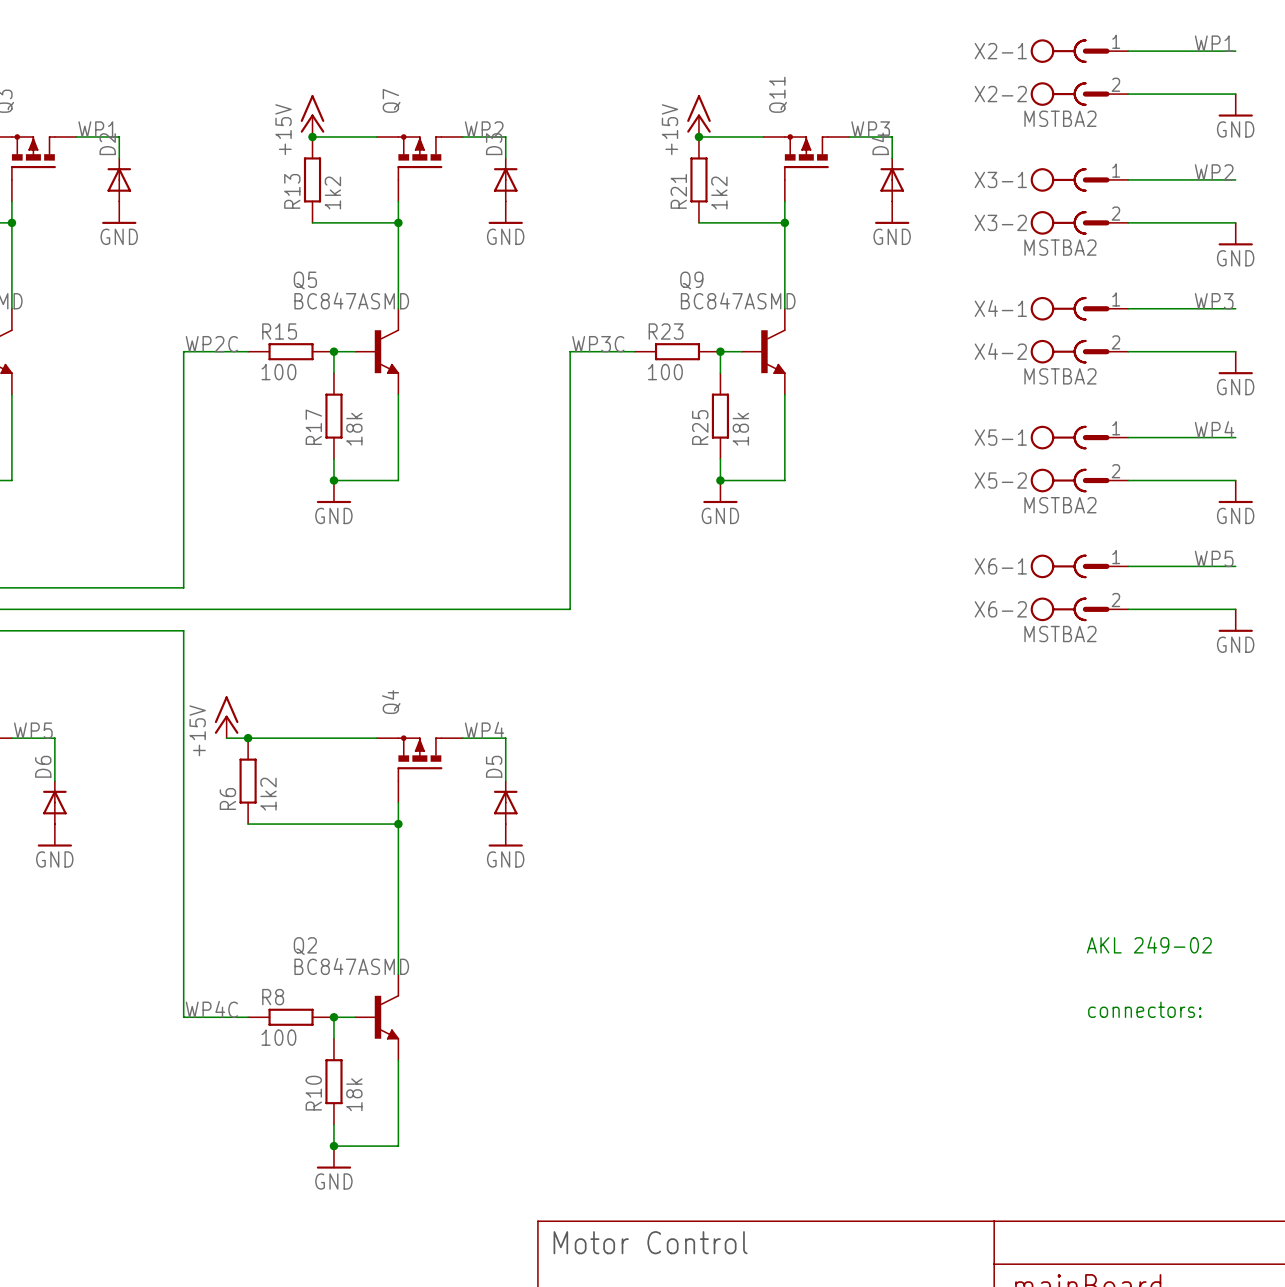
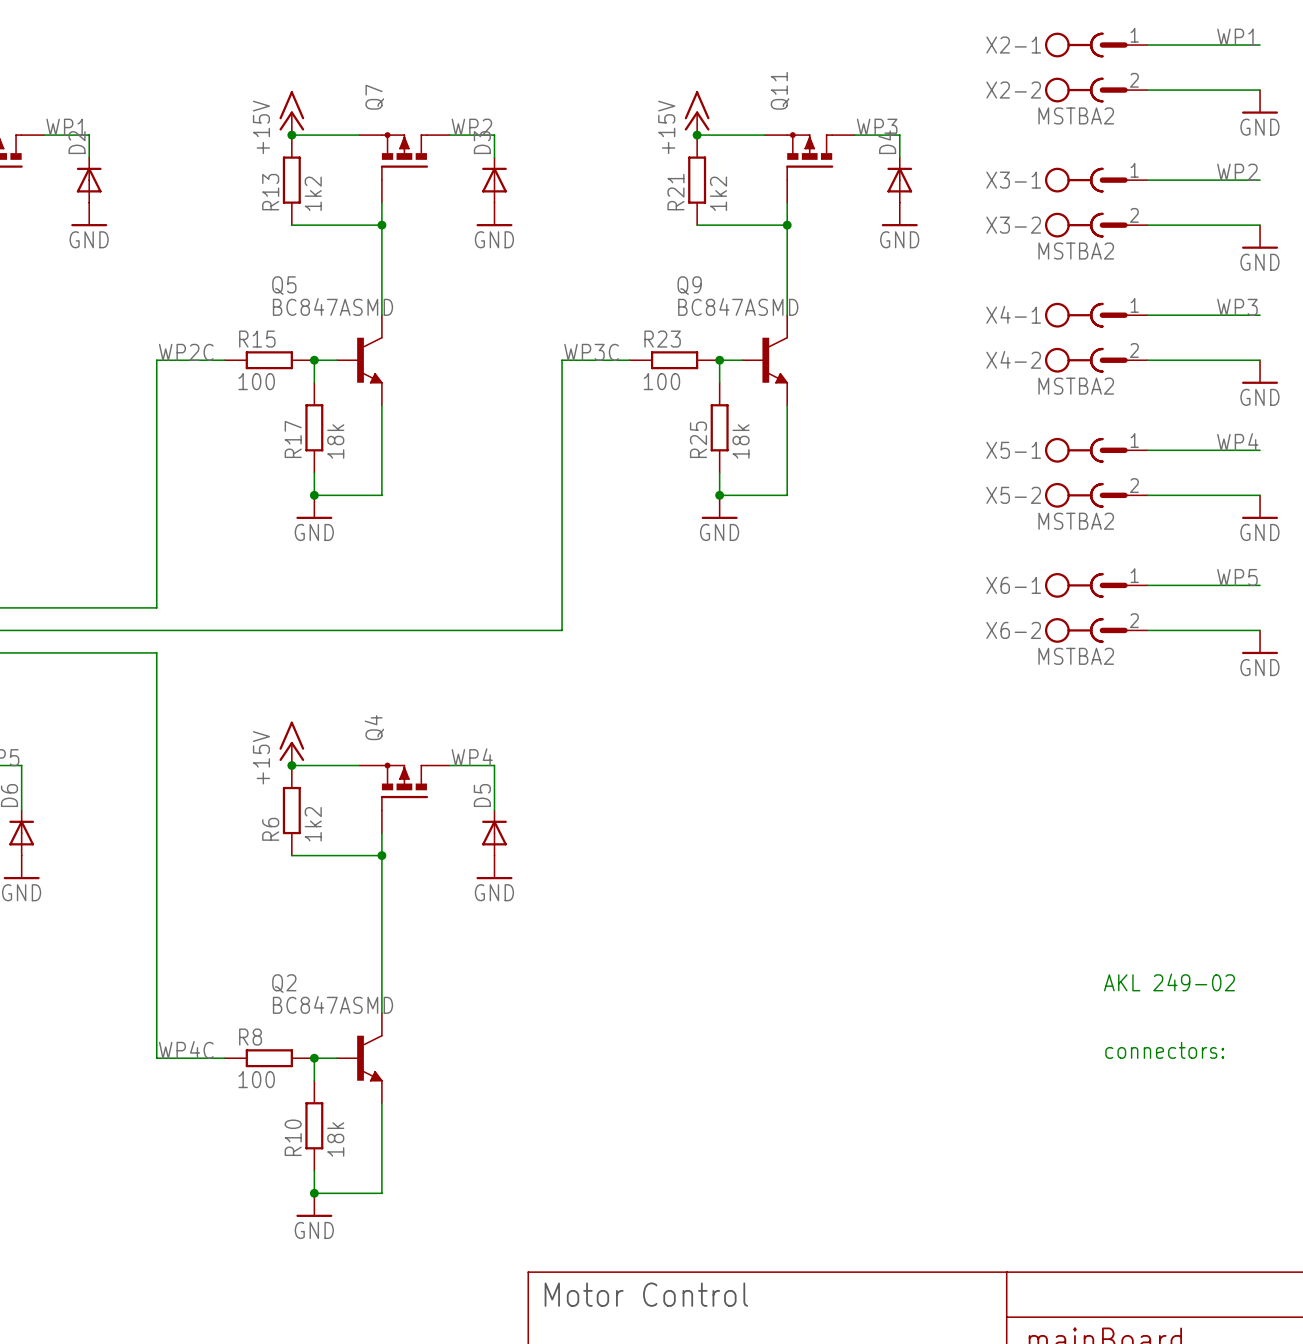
power symbol position: +15V (226, 717) -> +15V (291, 743)
wire: (226, 738) (312, 738) -> none
junction: (248, 738) -> none
junction: none -> (291, 765)
R6 position: (248, 781) -> (291, 810)
wire: (248, 824) (312, 824) -> none

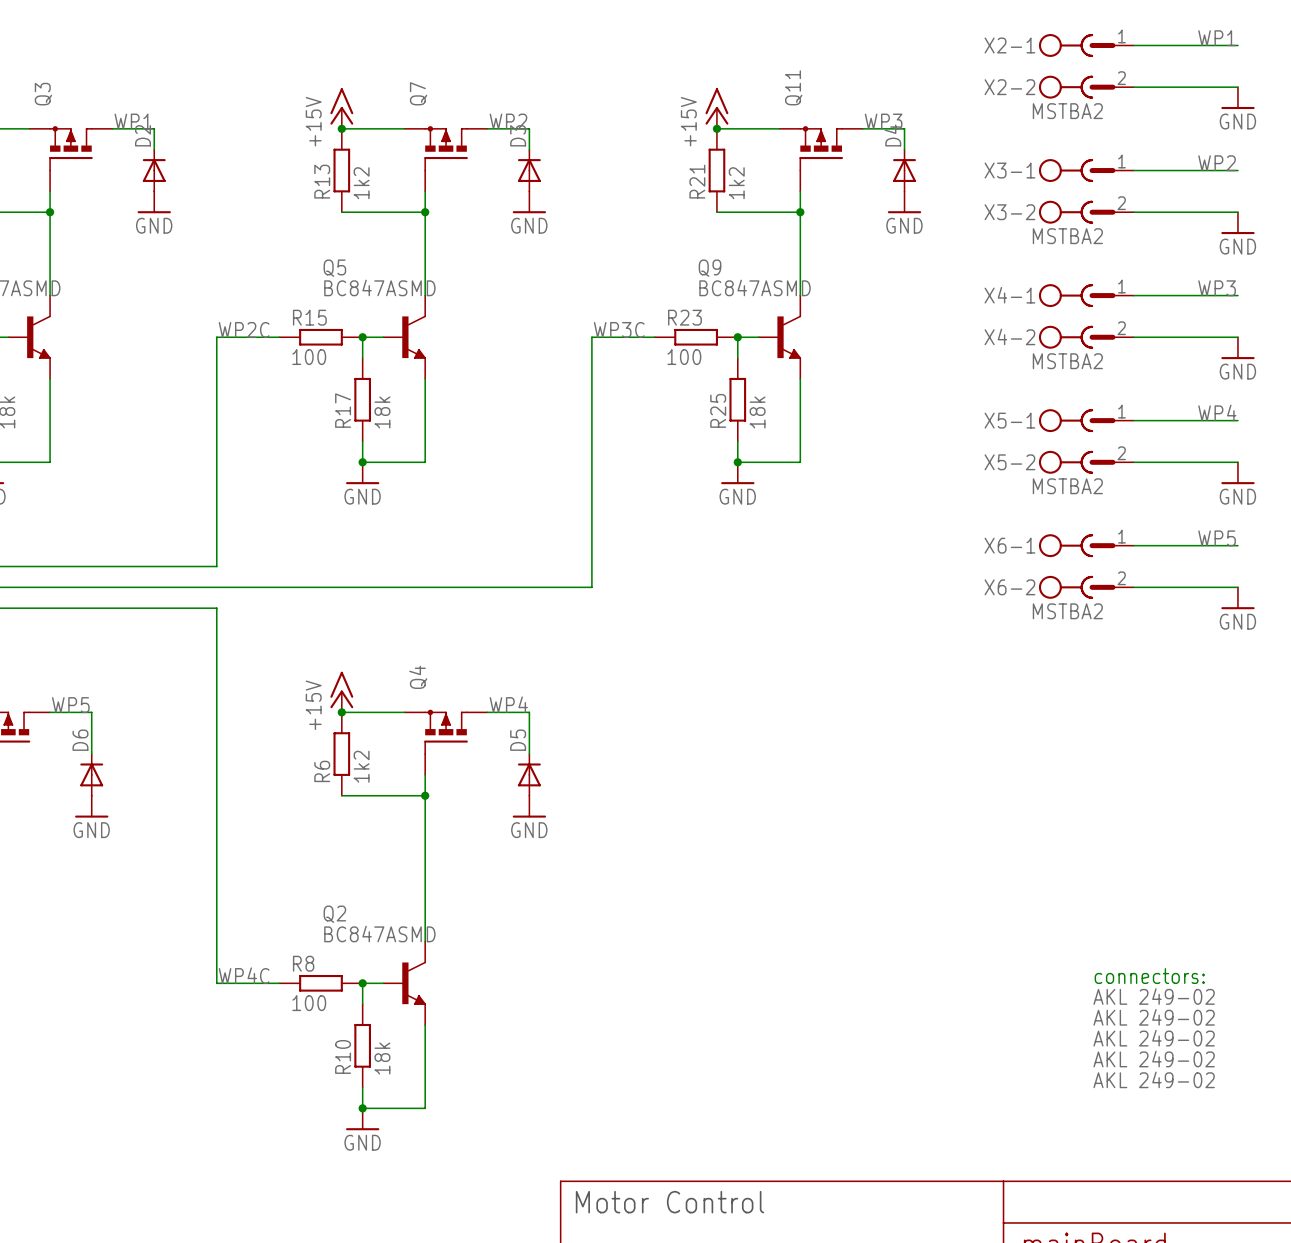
text: AKL 249-02 (1169, 982) -> none
part: none -> AKL 249-02 (1154, 996)
part: none -> AKL 249-02 (1154, 1017)
part: none -> AKL 249-02 (1154, 1038)
part: none -> AKL 249-02 (1154, 1059)
part: none -> AKL 249-02 (1154, 1079)

